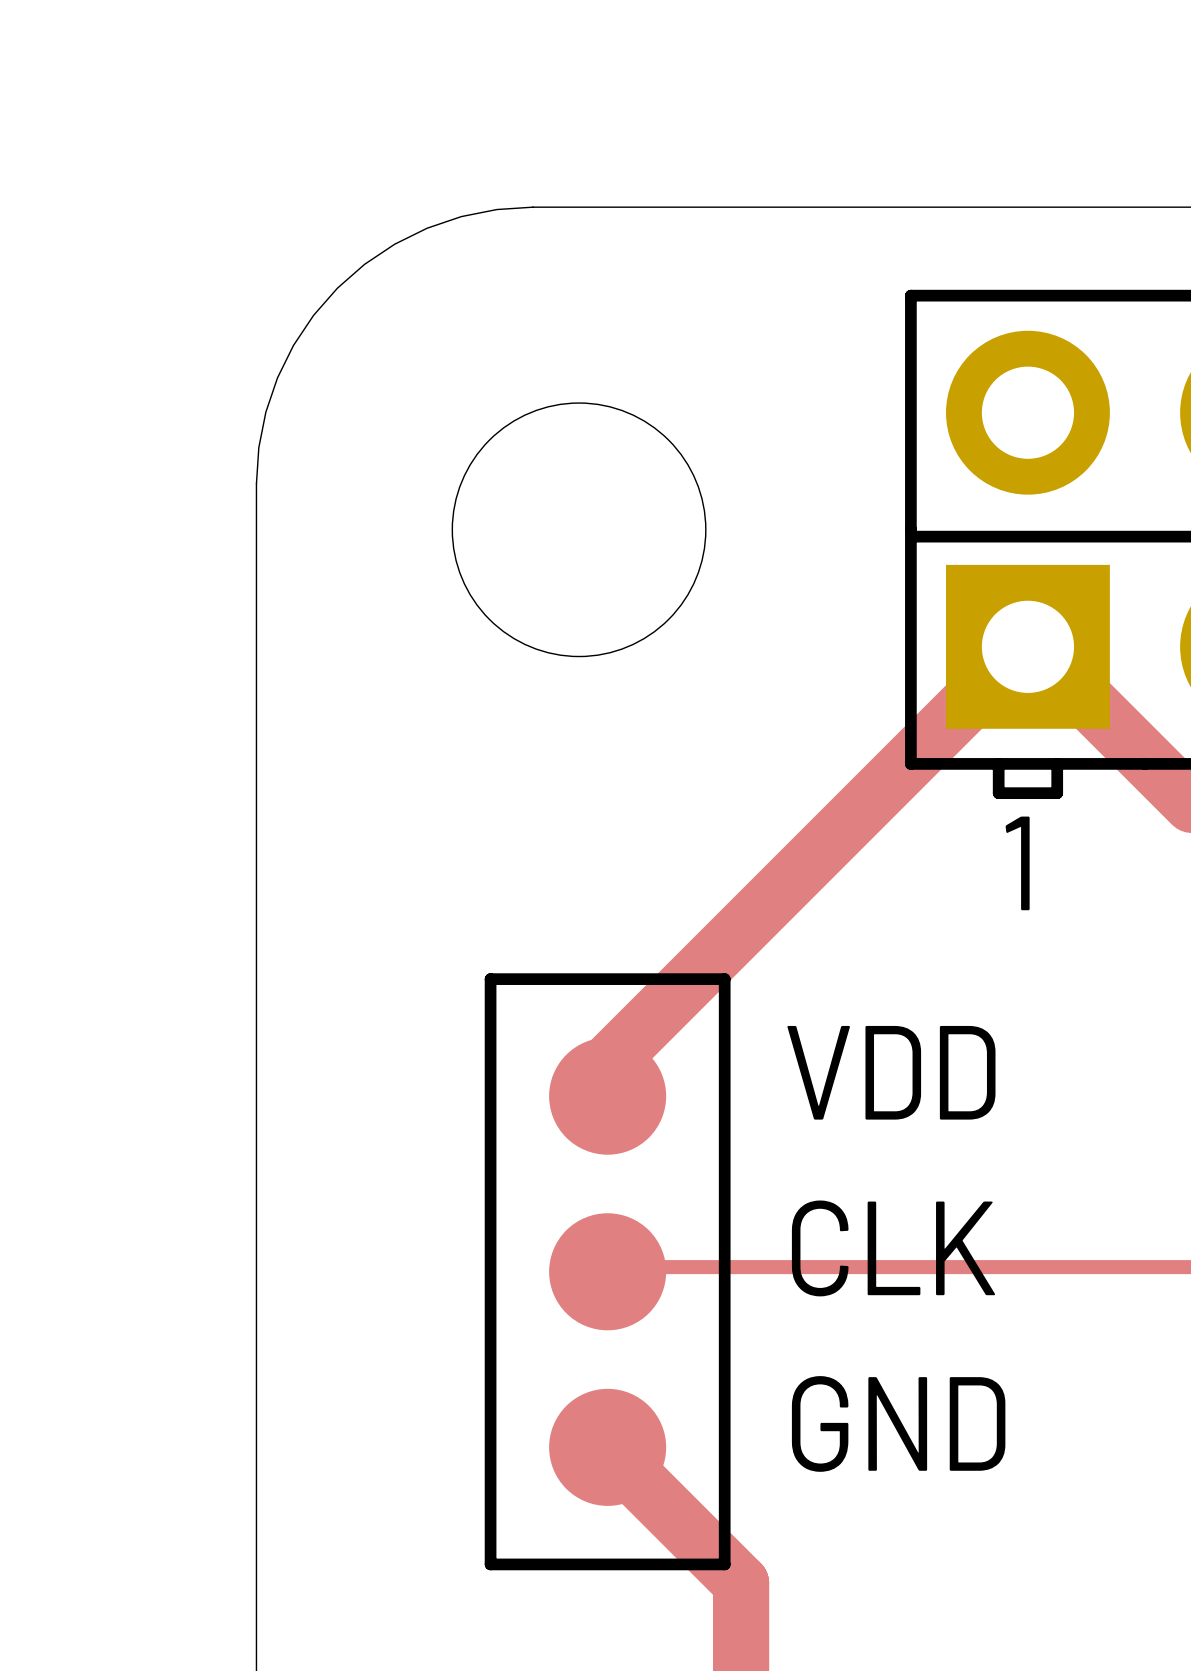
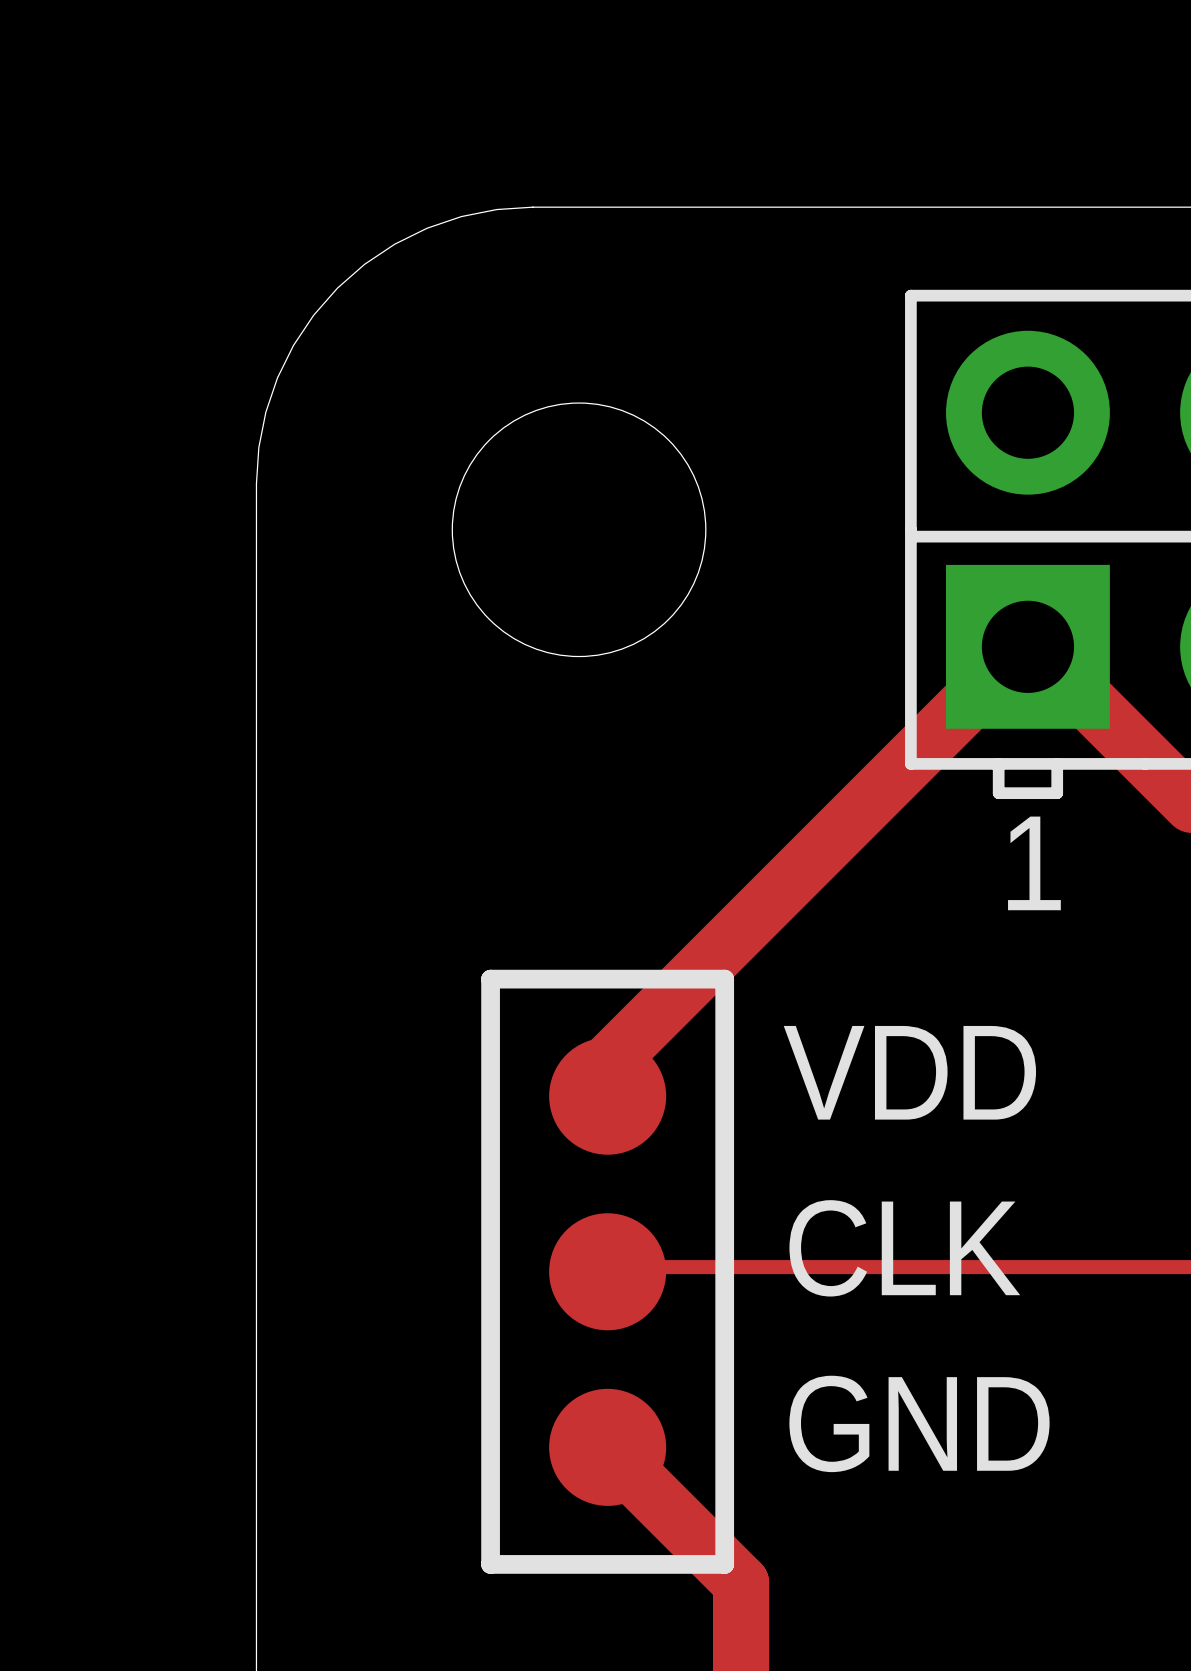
line width: thin (490, 979) (724, 979) (724, 1564) (490, 1564) (490, 979) -> thick (490, 979) (724, 979) (724, 1564) (490, 1564) (490, 979)

